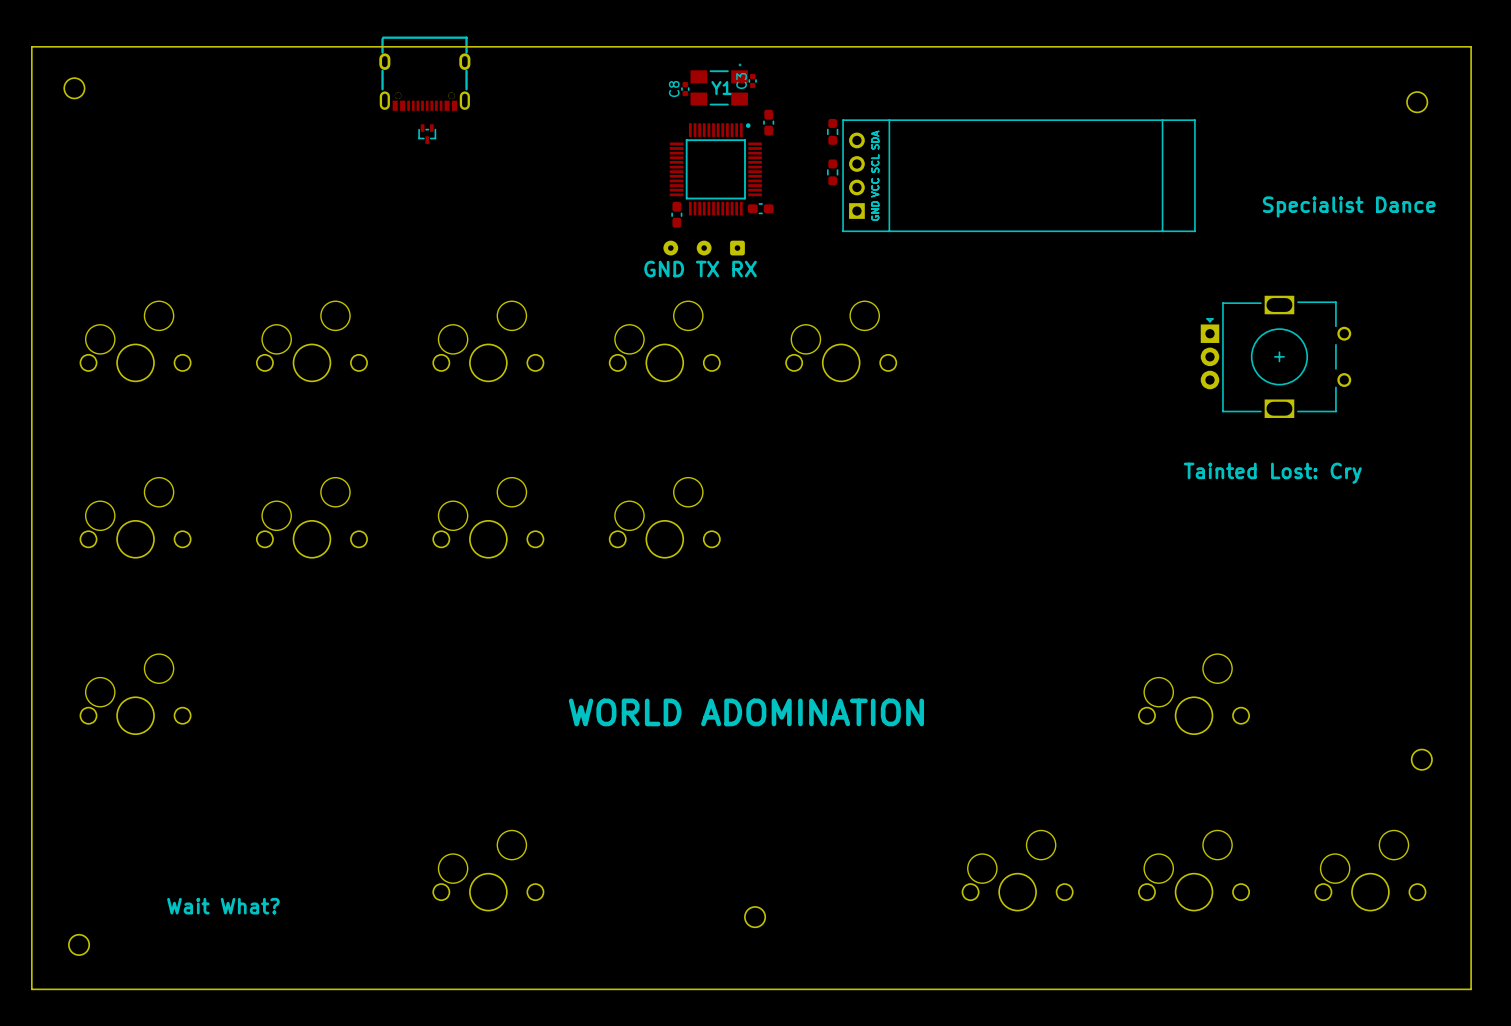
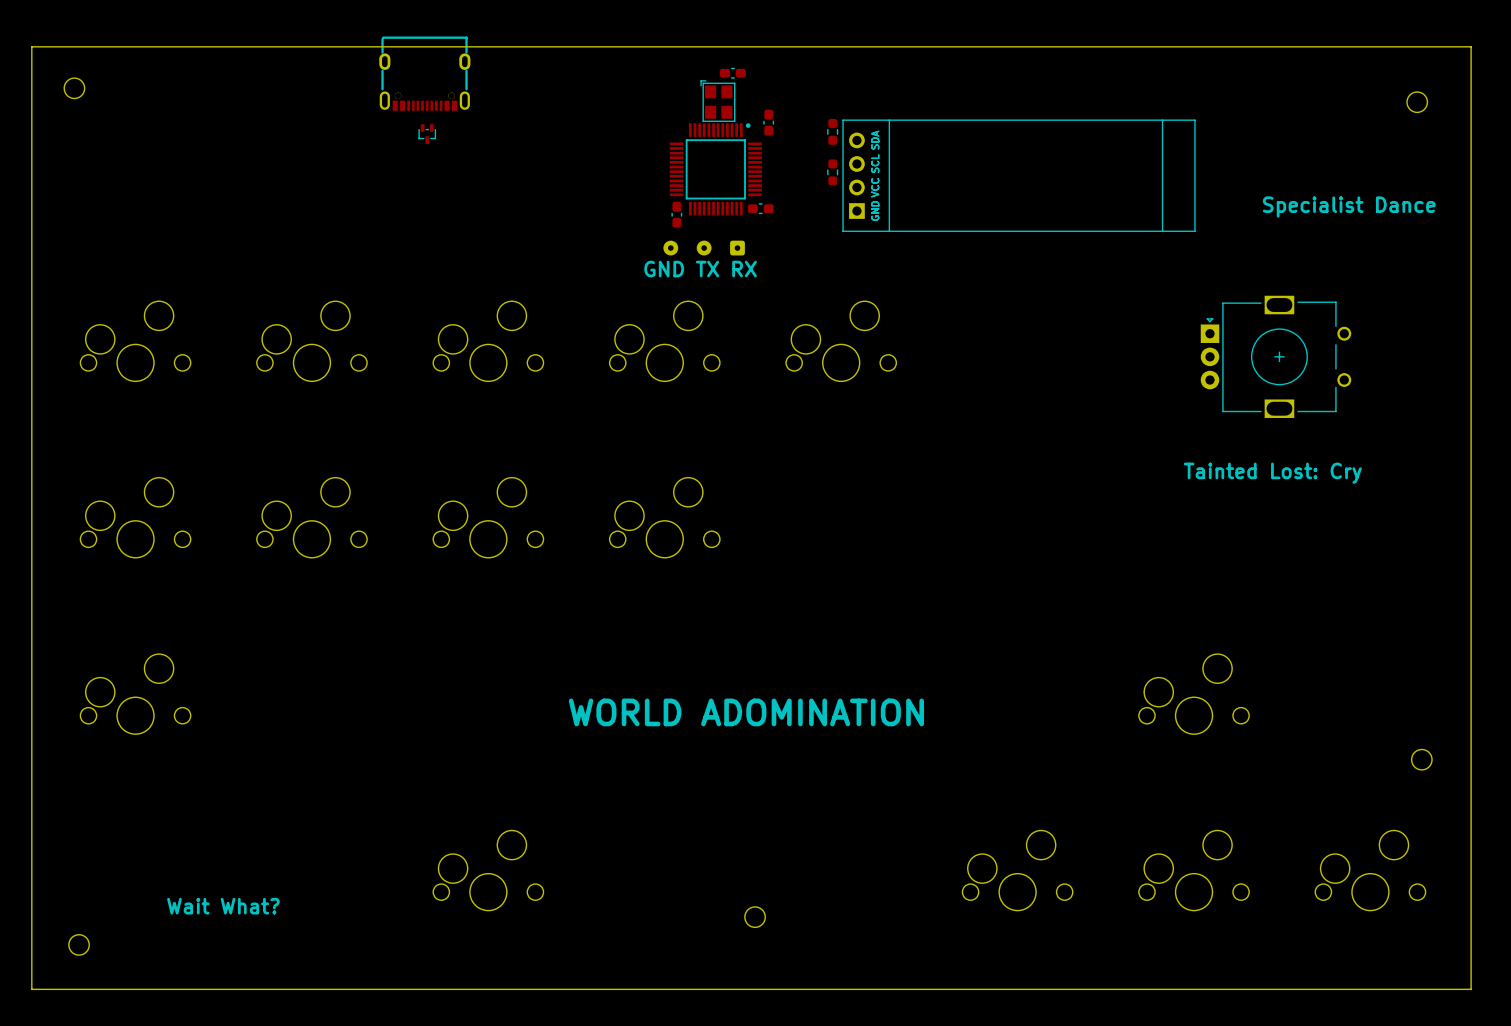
part: none -> (732, 73)
C3: (752, 80) -> none
Y1: (719, 84) -> none
C8: (685, 89) -> none
part: none -> (717, 101)

